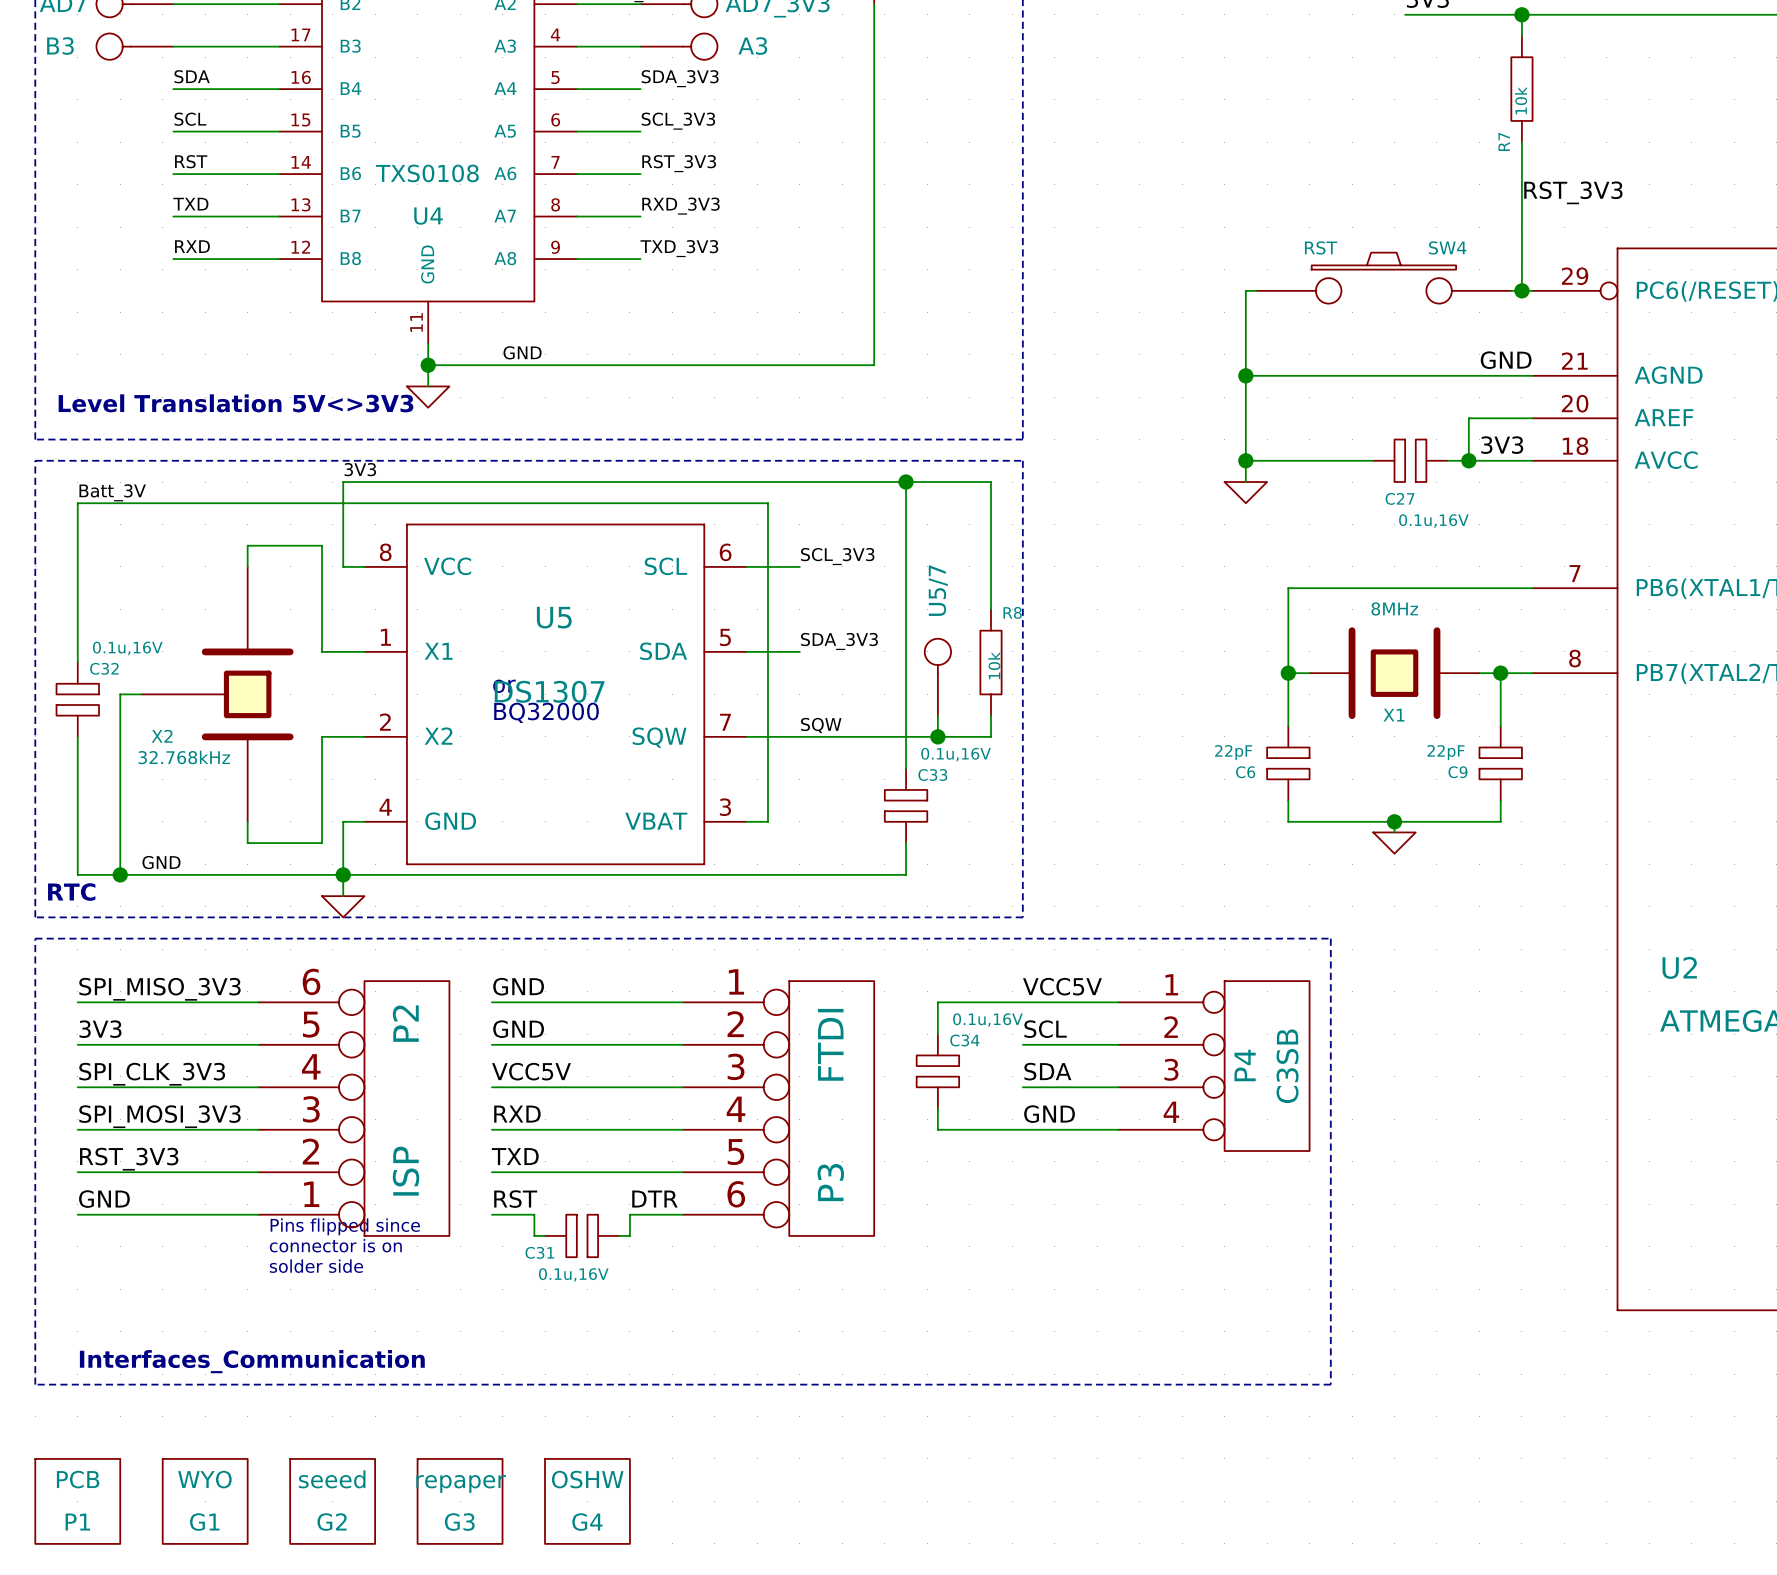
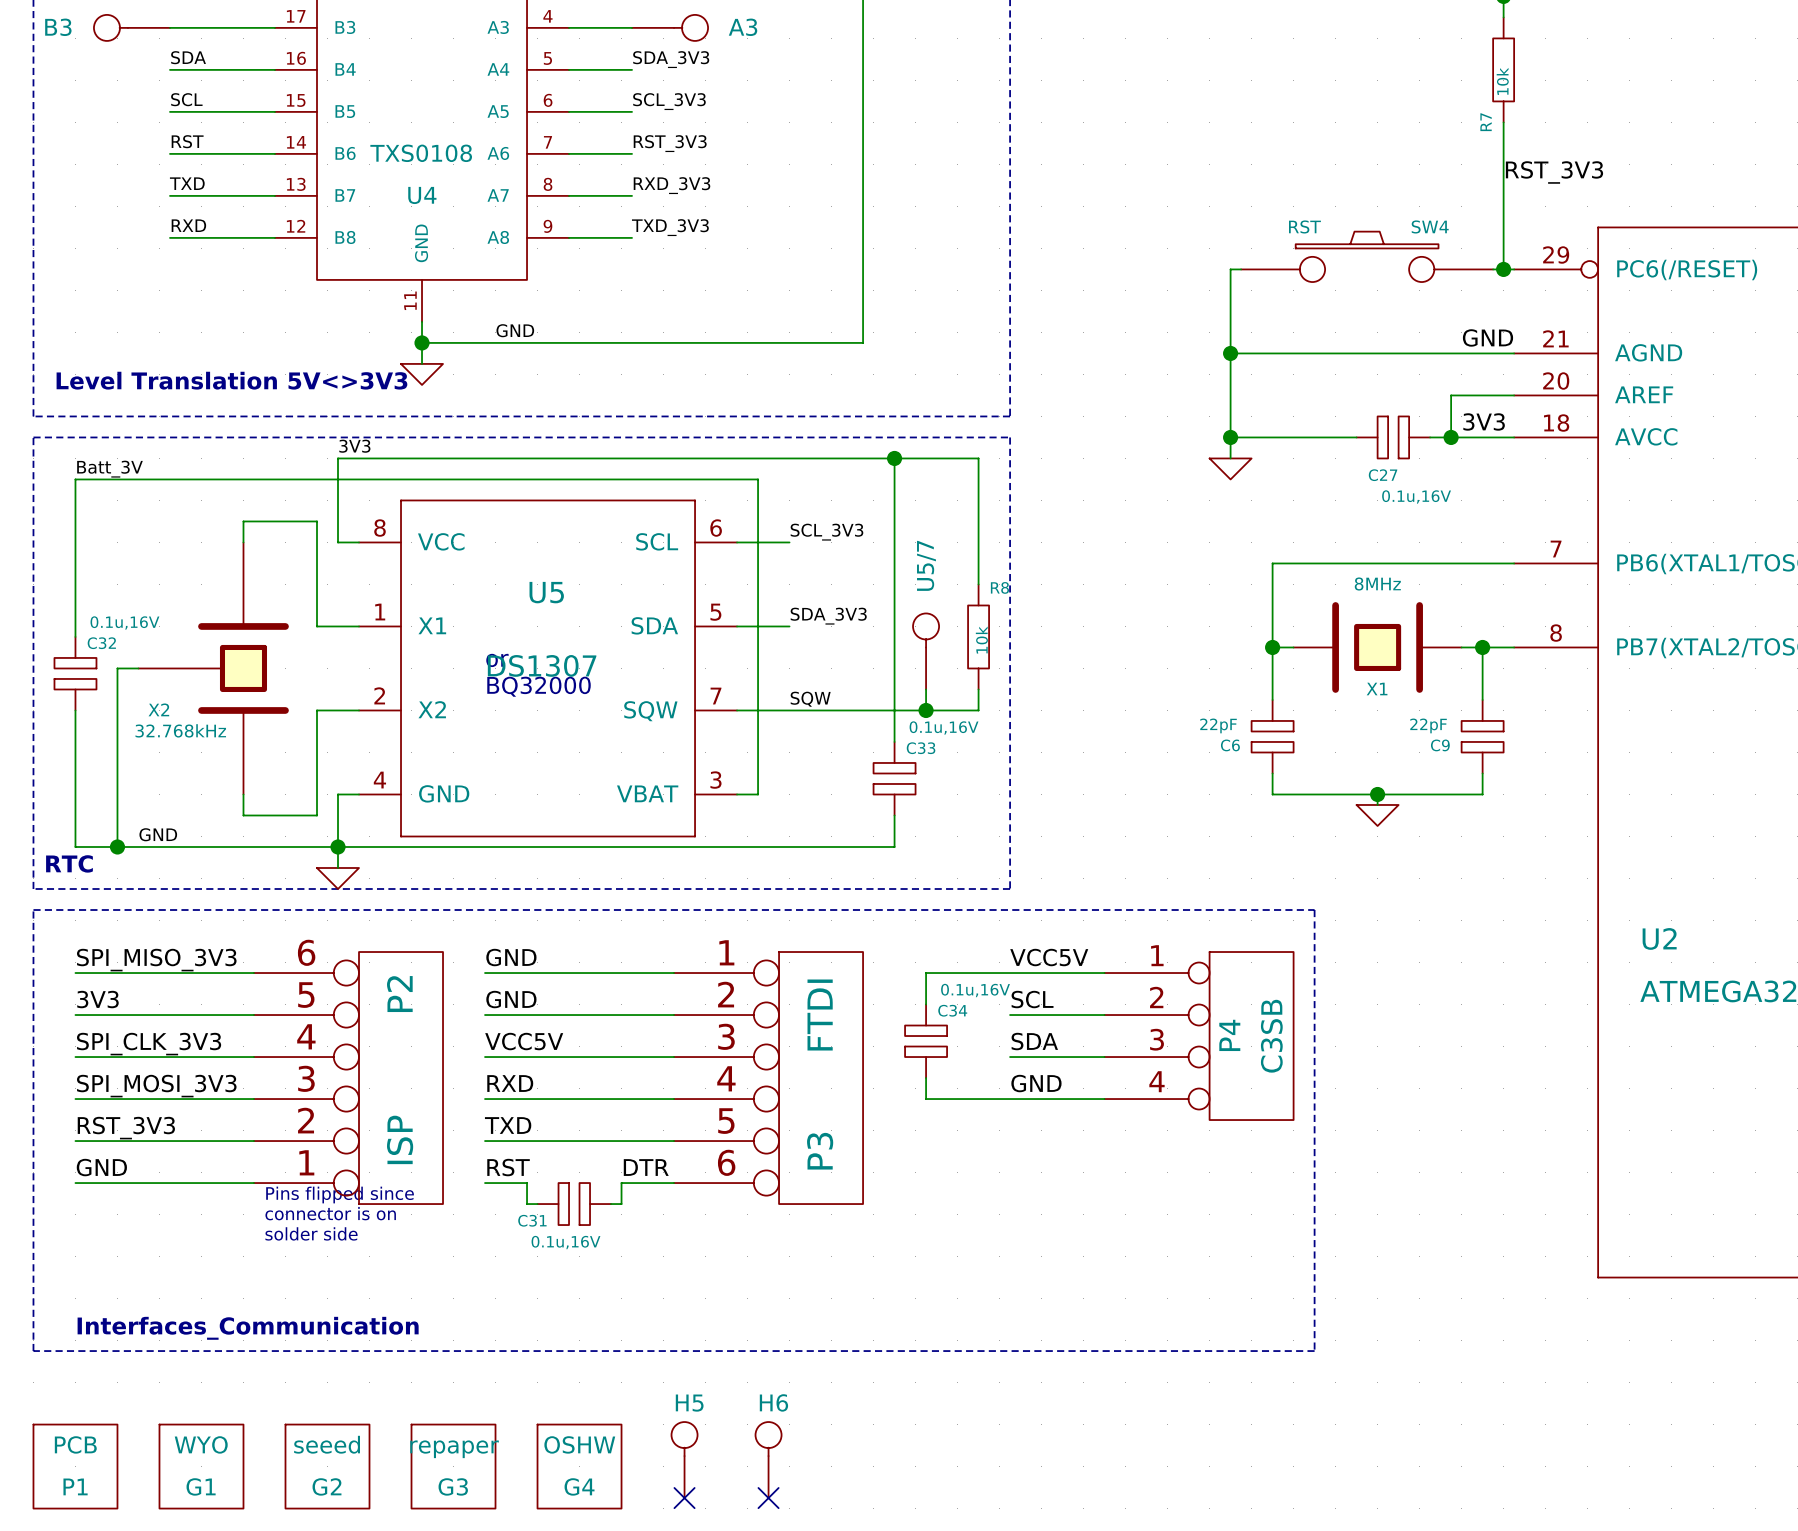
H5: none -> (684, 1460)
H6: none -> (768, 1460)
no-connect mark: none -> (684, 1498)
no-connect mark: none -> (768, 1498)

